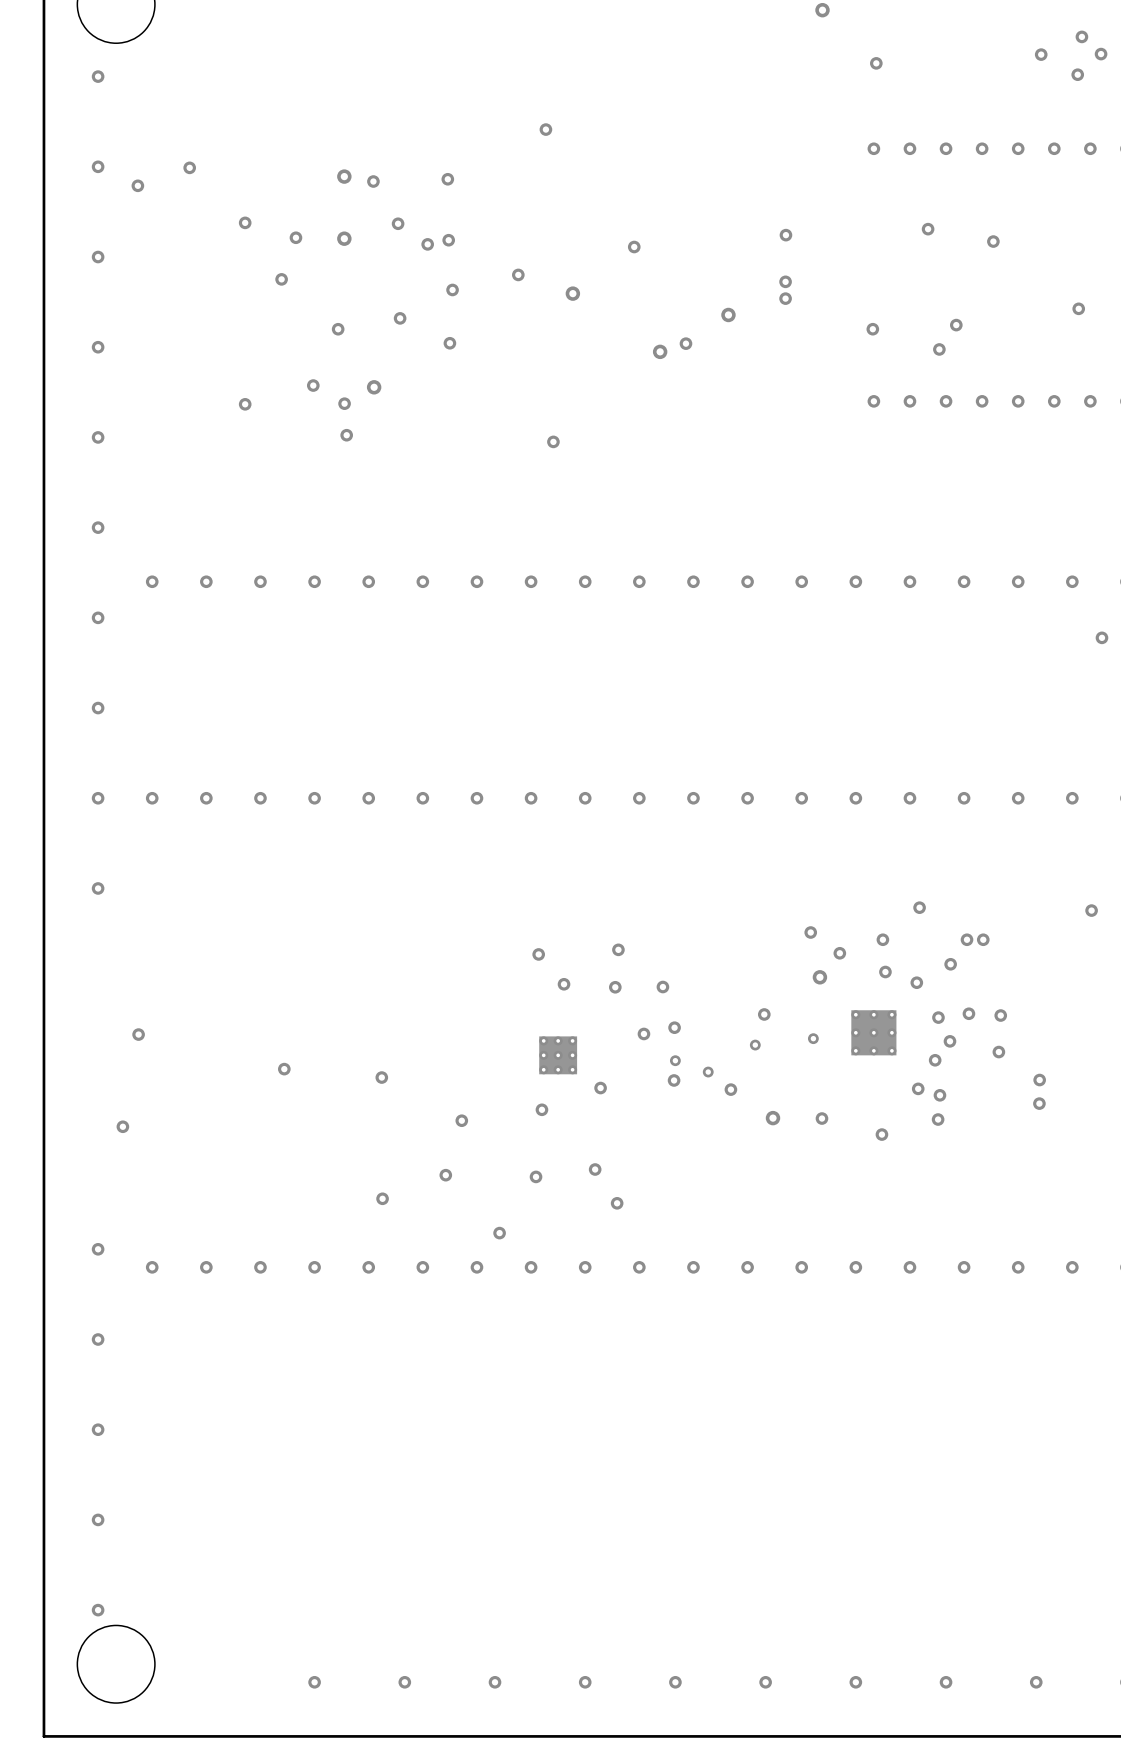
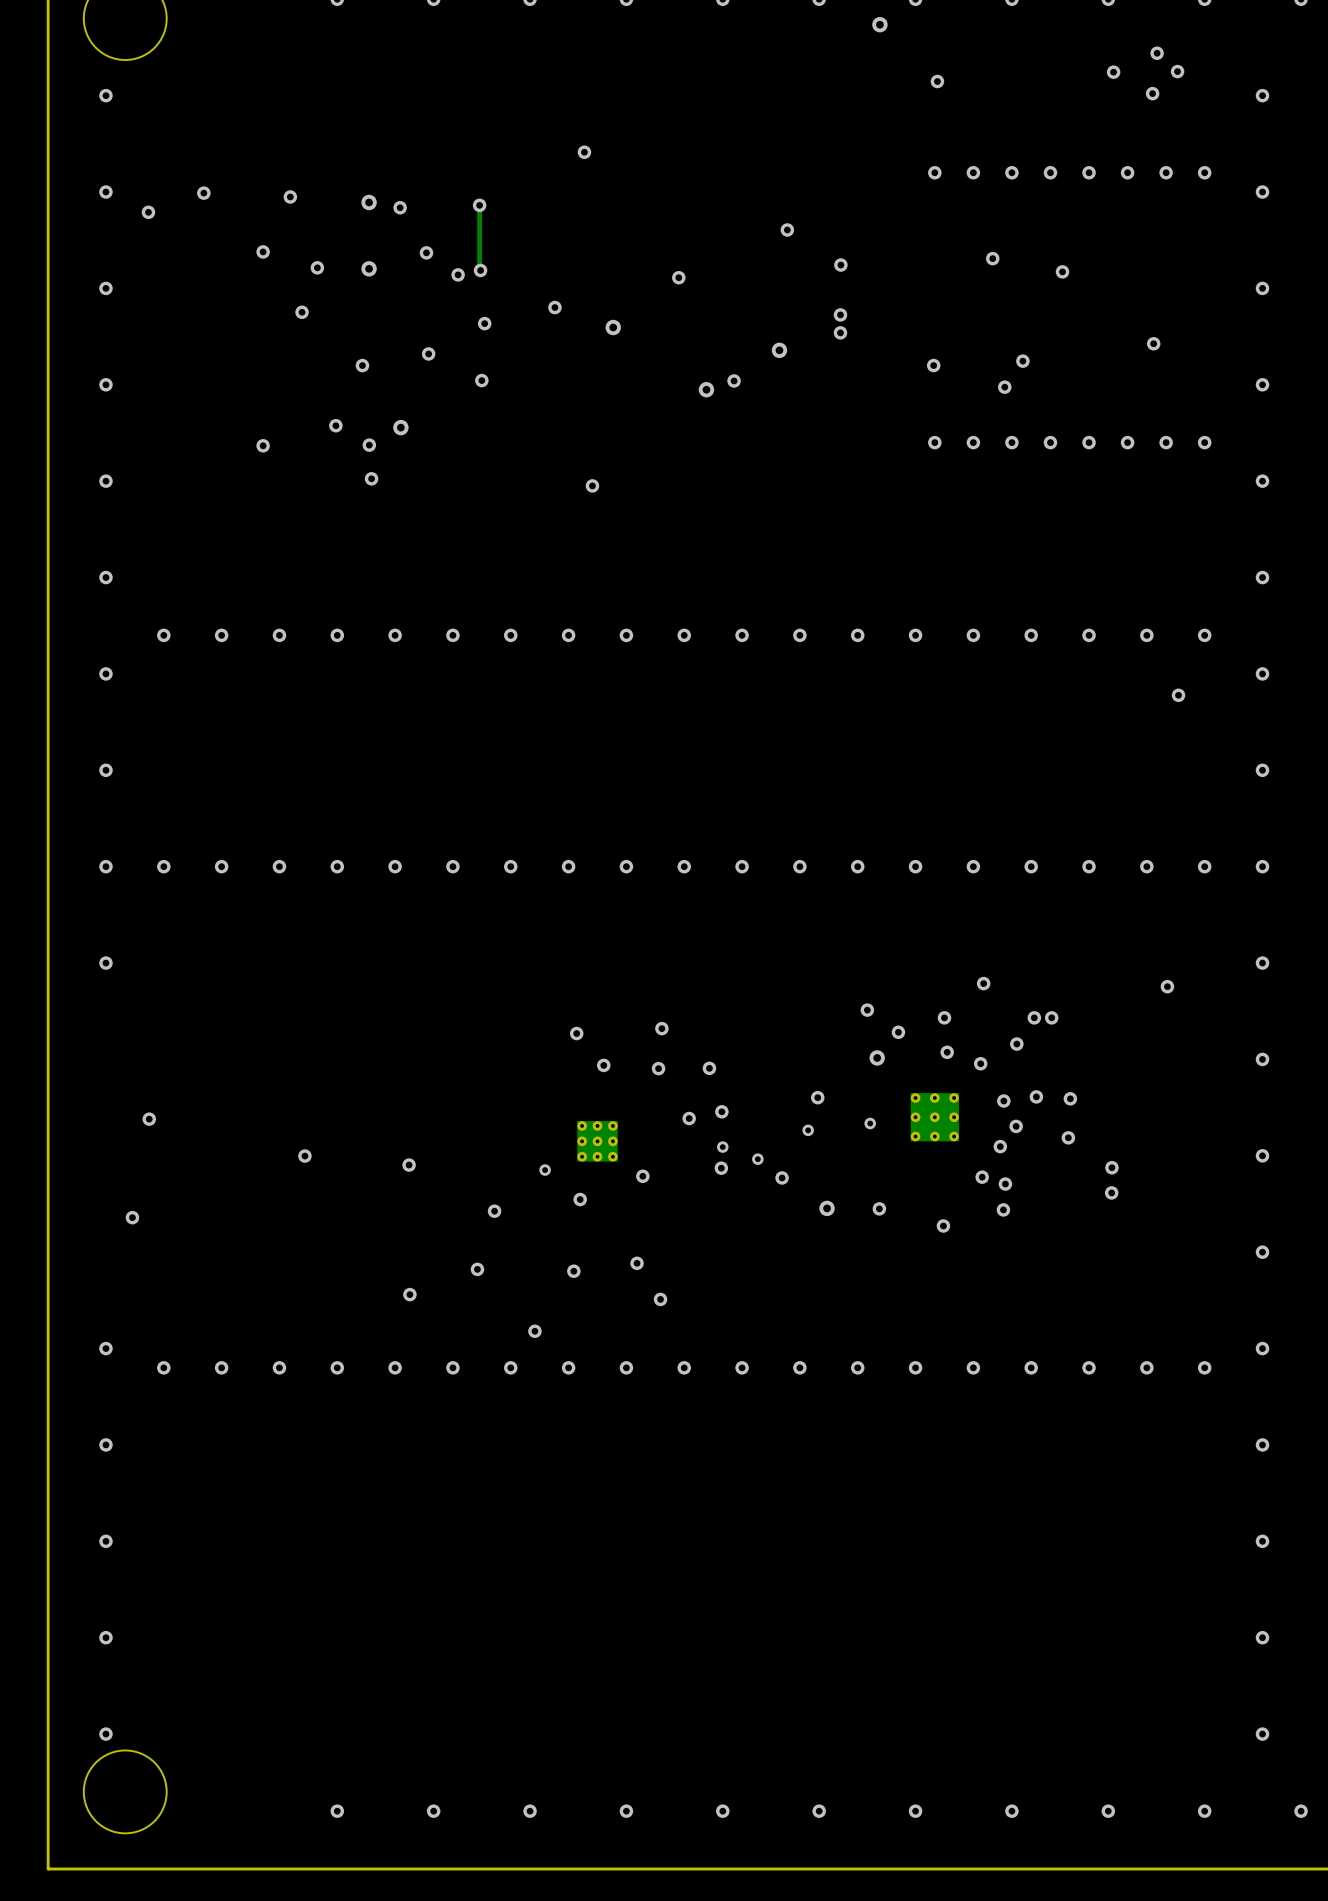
via: none -> (290, 196)
track: none -> (479, 205) (480, 270)
via: none -> (787, 229)
via: none -> (545, 1170)

